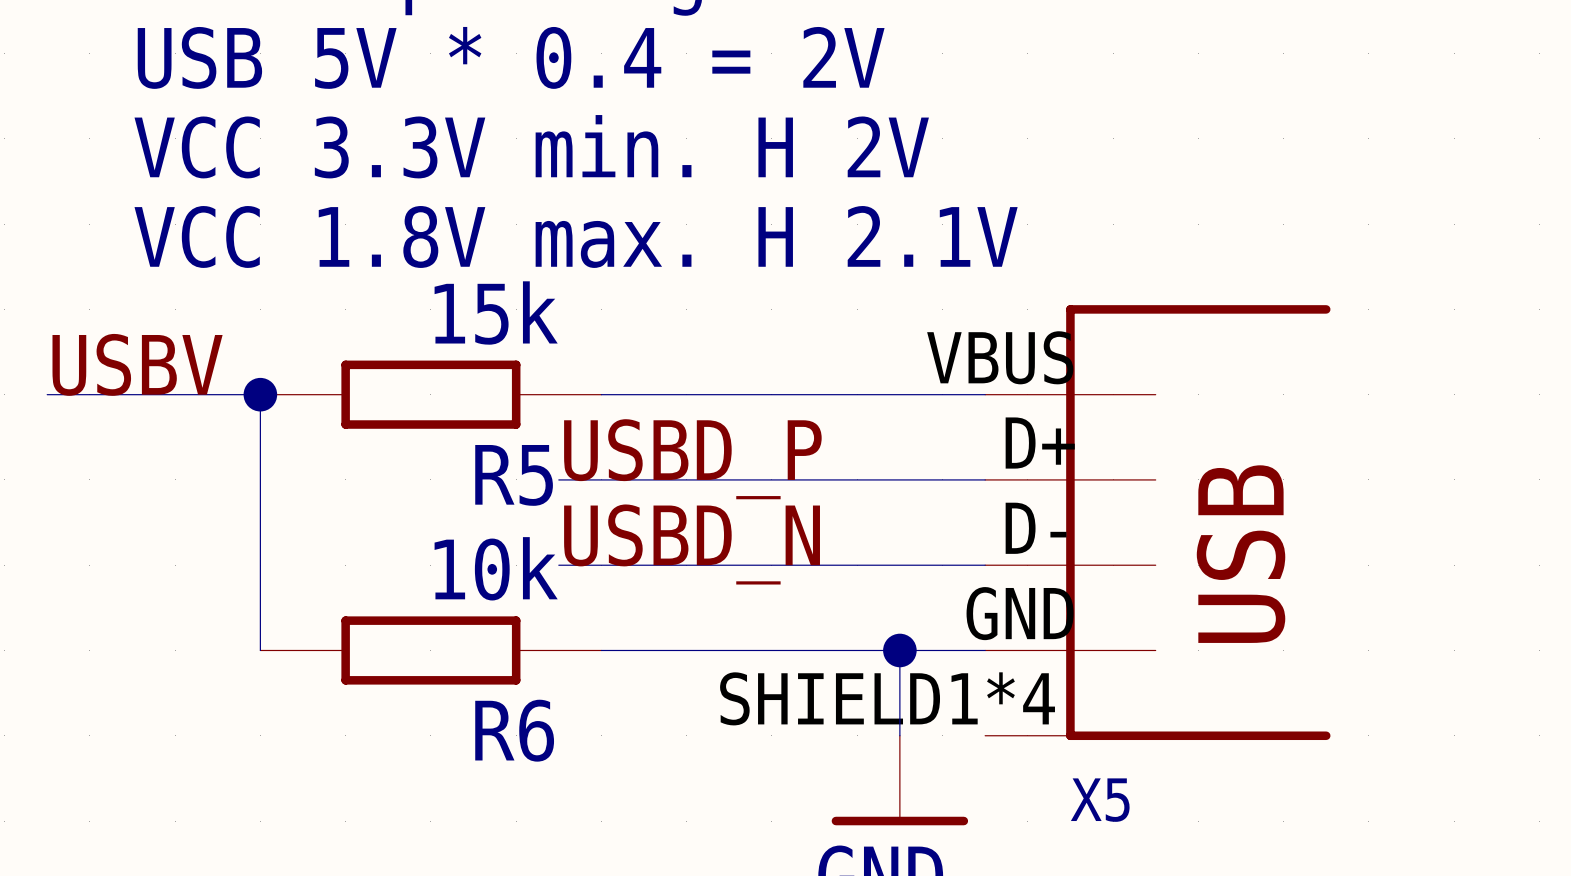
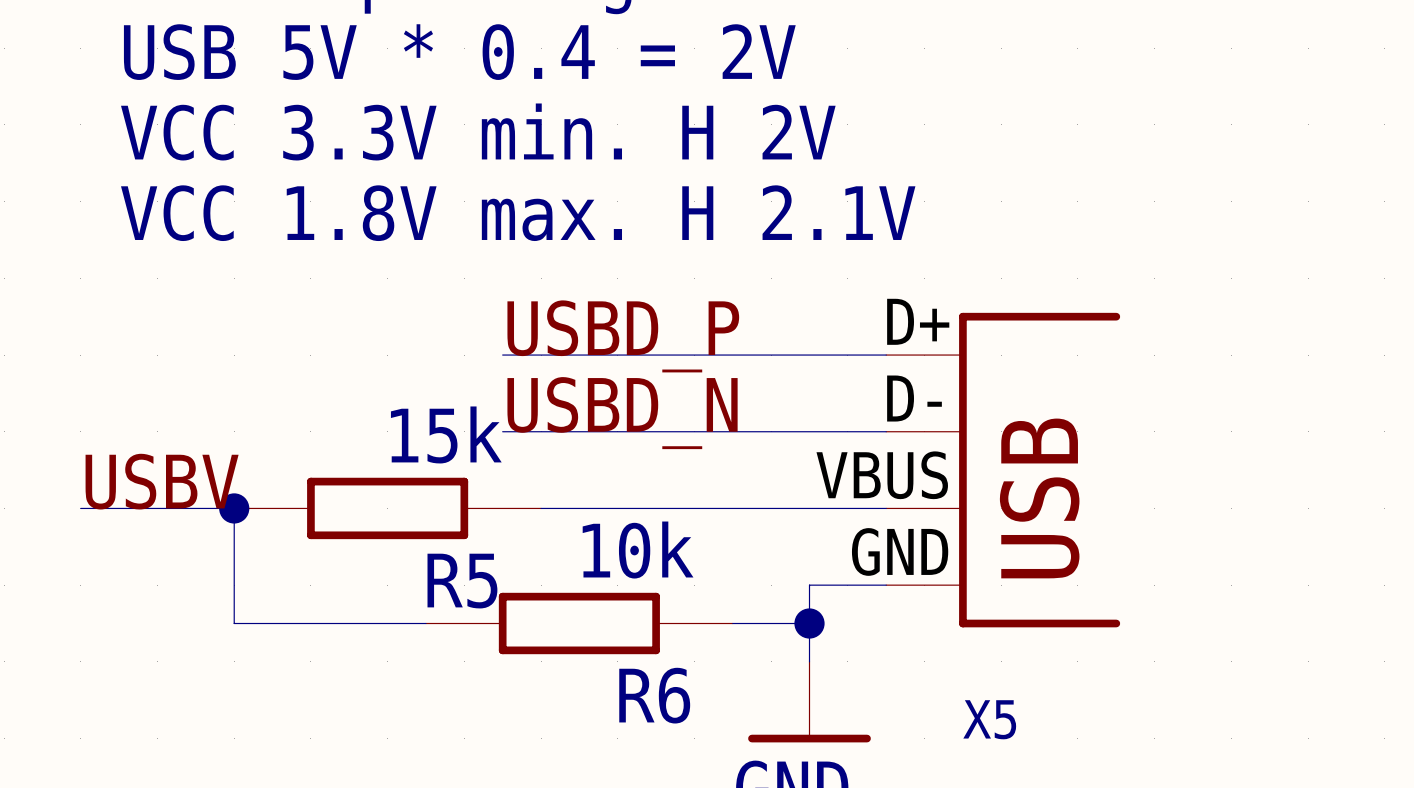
X5 symbol: [985, 305, 1331, 741] -> [886, 312, 1121, 628]
label position: USBV (137, 364) -> USBV (162, 481)
label: none -> USBD_P (623, 336)
wire: (47, 394) (260, 394) (260, 565) -> (80, 508) (234, 508)
junction position: (260, 394) -> (234, 508)
R5 position: (430, 394) -> (387, 508)
label: USBD_P (692, 459) -> USBD_N (622, 413)
label: USBD_N (692, 544) -> none
wire: none -> (234, 585) (234, 623) (425, 623)
R6 position: (430, 650) -> (579, 623)
wire: (601, 650) (899, 650) -> none
junction position: (899, 650) -> (809, 623)
wire: none -> (732, 623) (809, 623)

